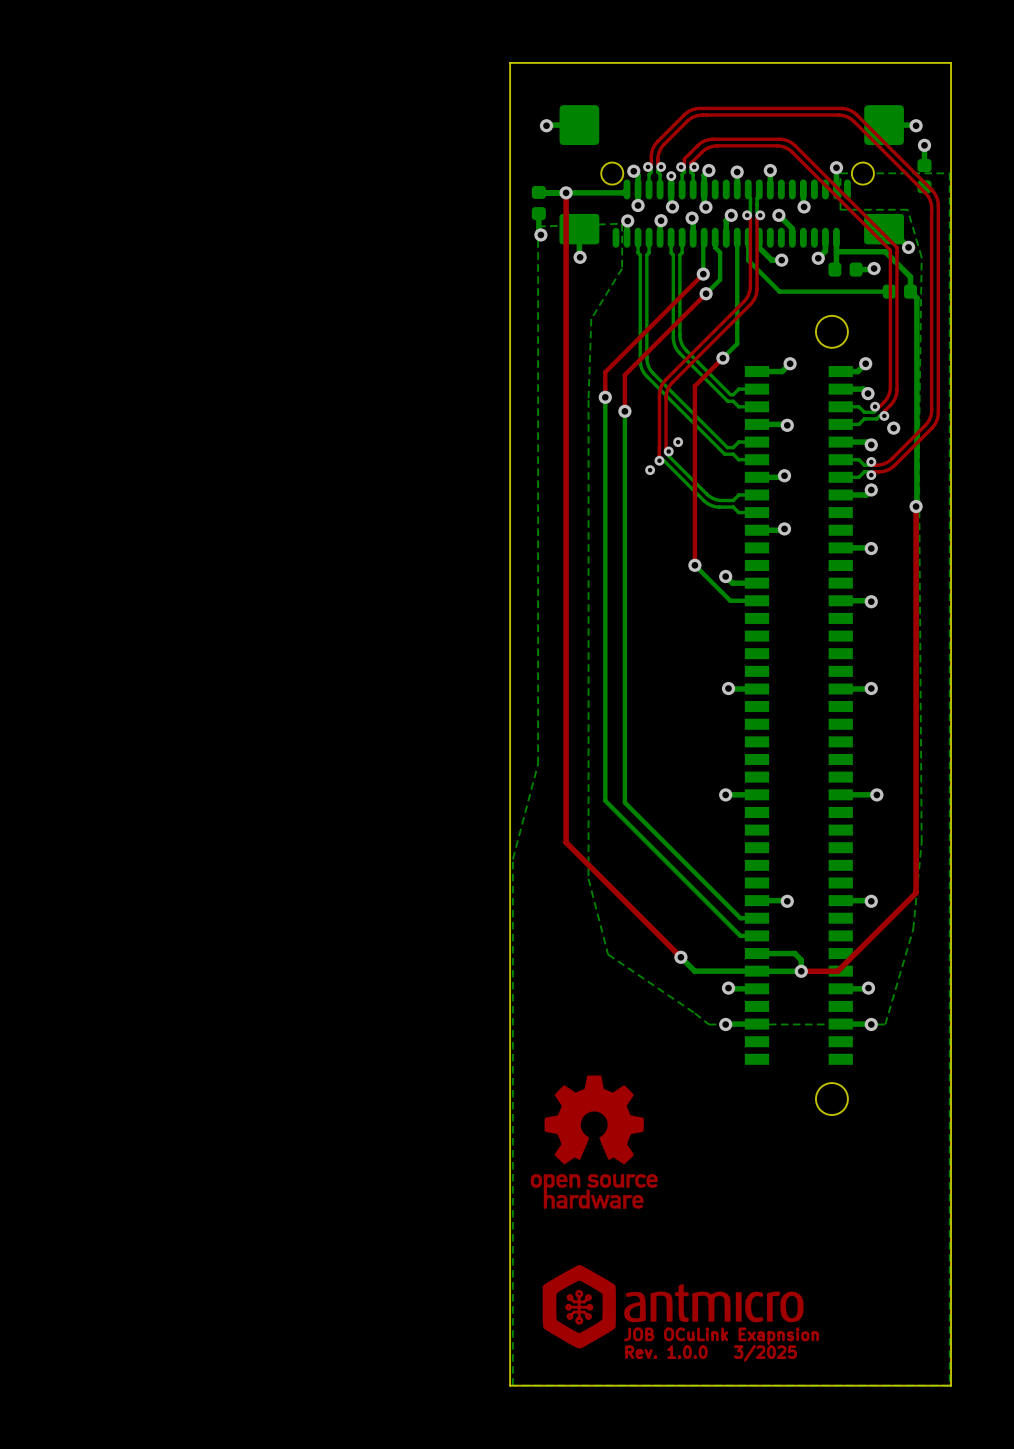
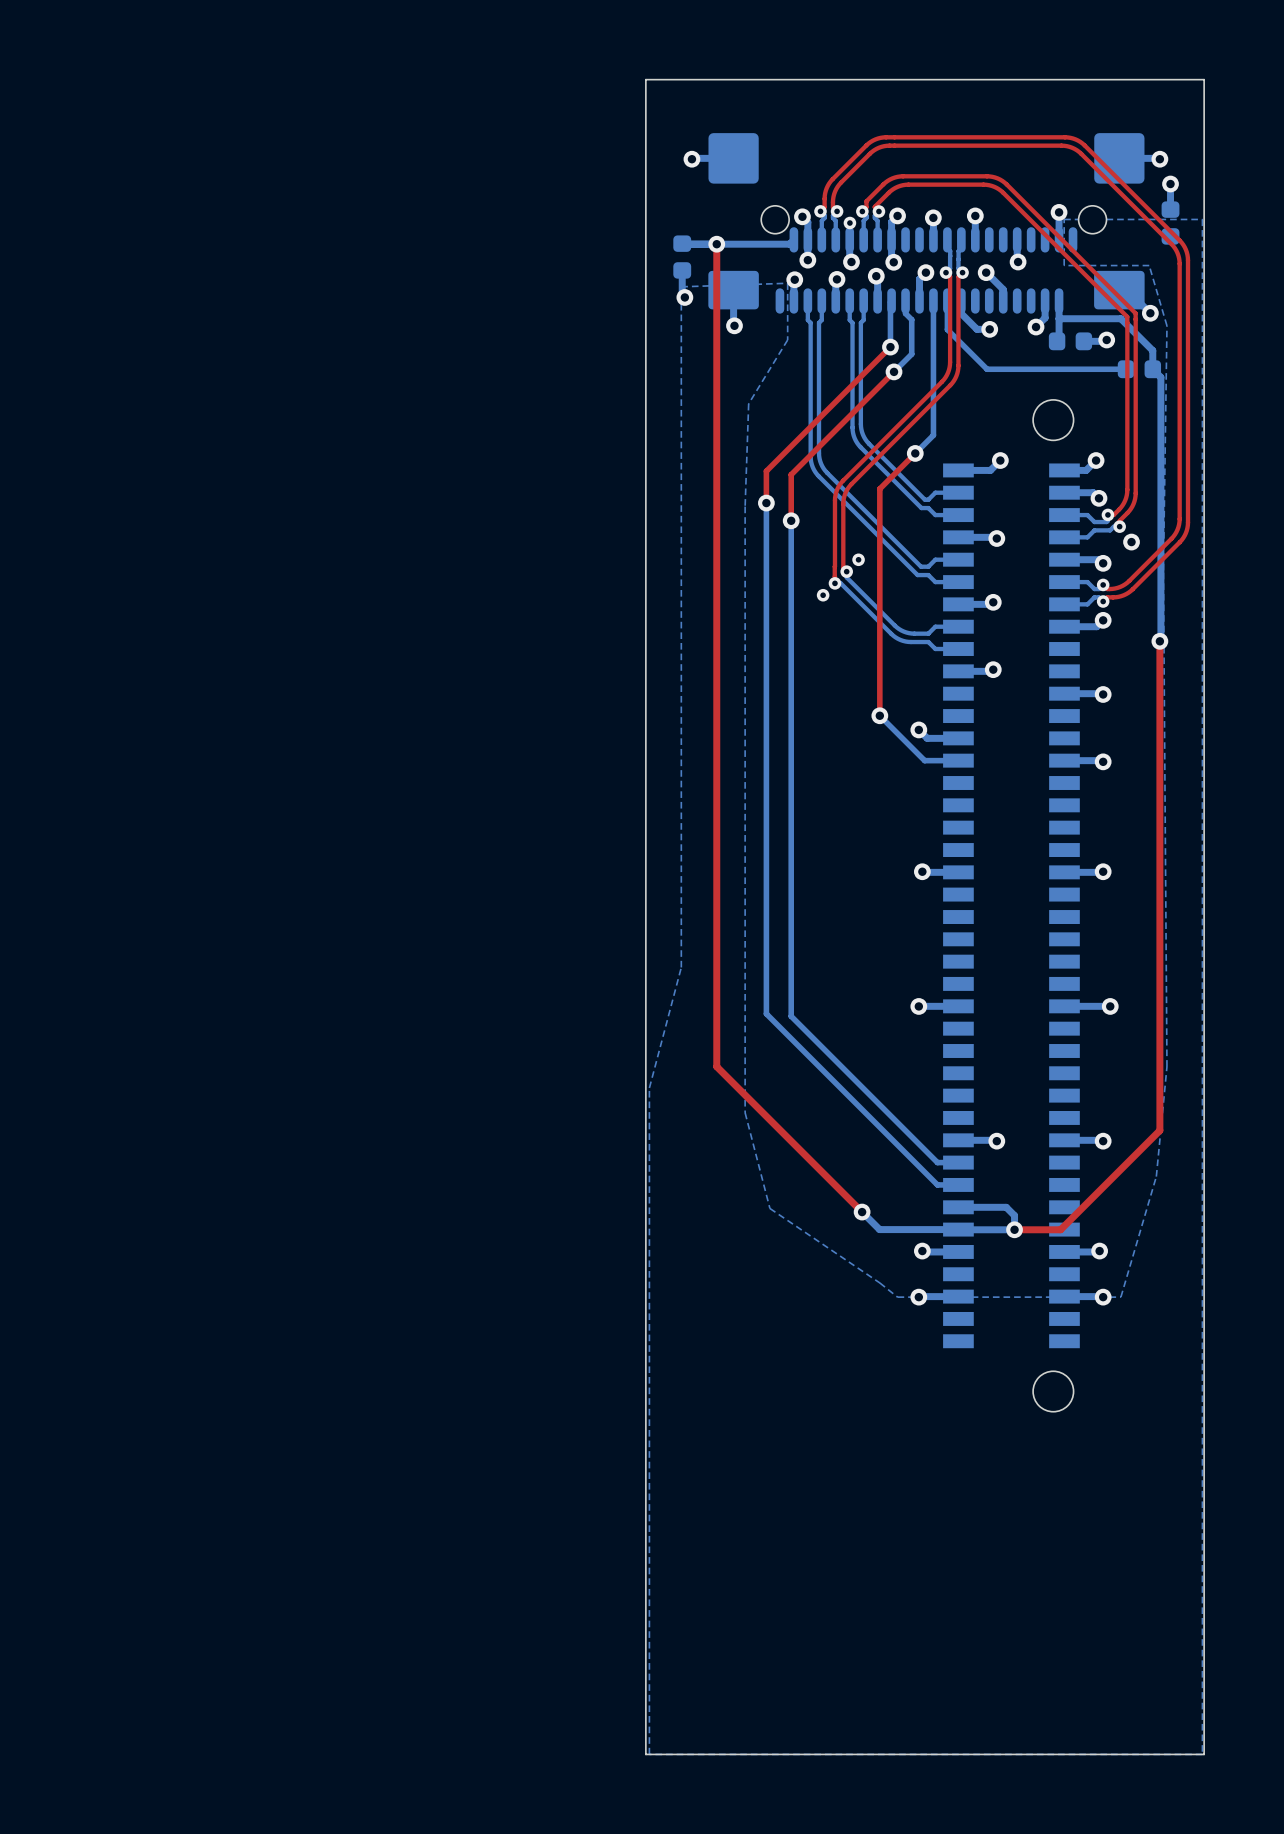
drawing: [530, 1075, 658, 1209] -> none
drawing: [542, 1264, 804, 1349] -> none
text: JOB OCuLink Exapnsion (721, 1336) -> none
text: Rev. 1.0.0 3/2025 (711, 1353) -> none

